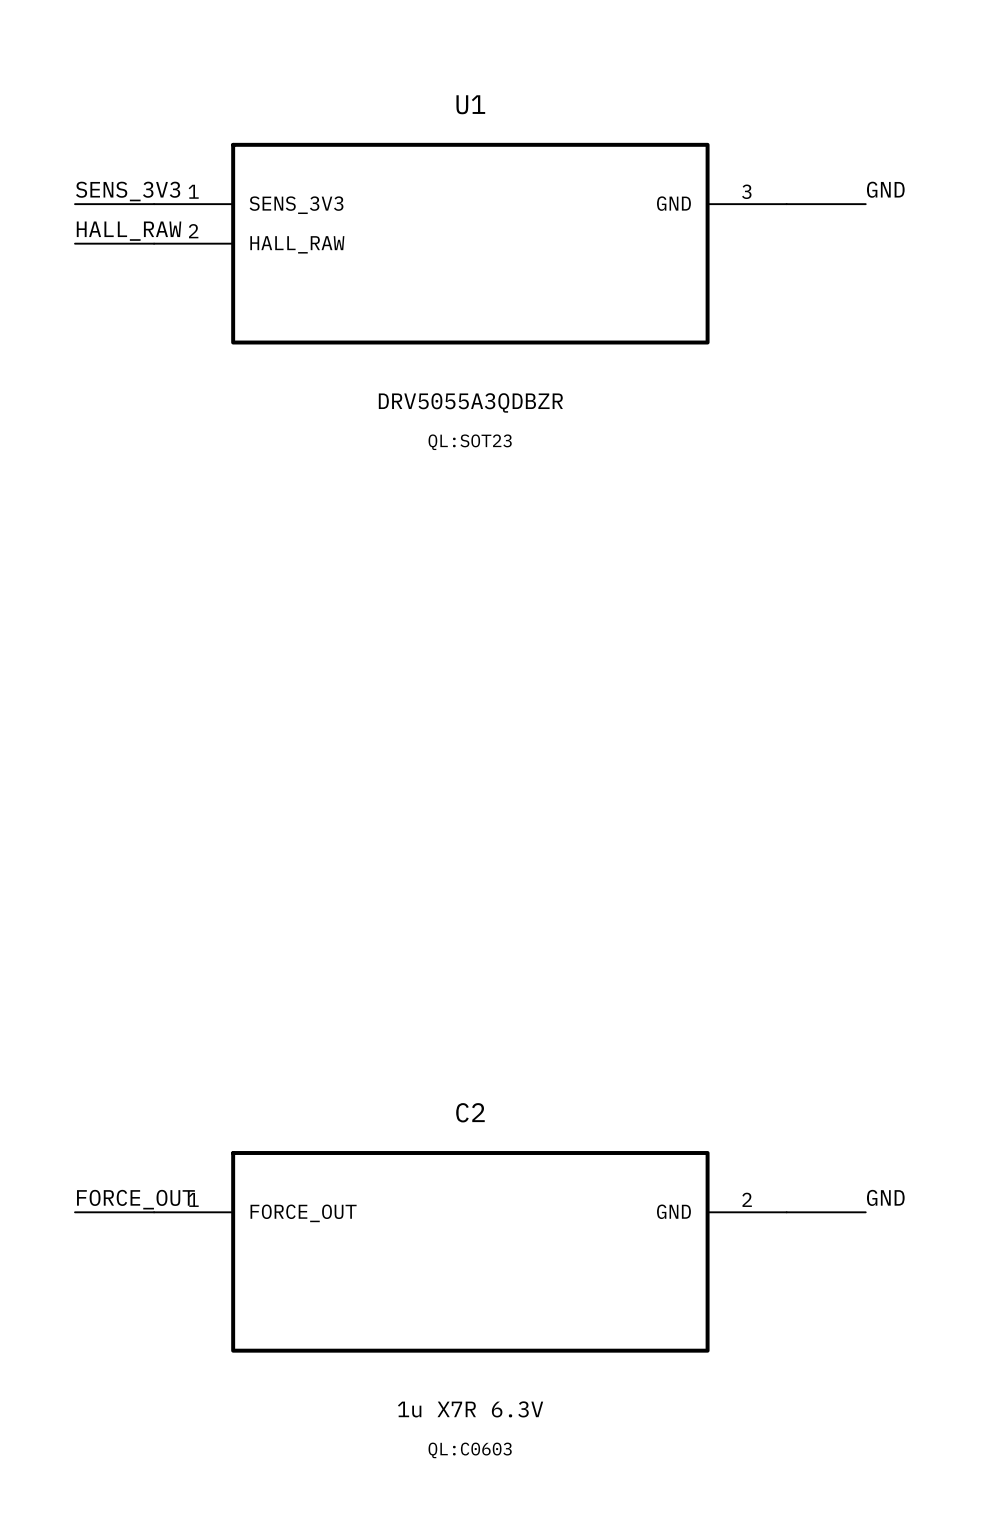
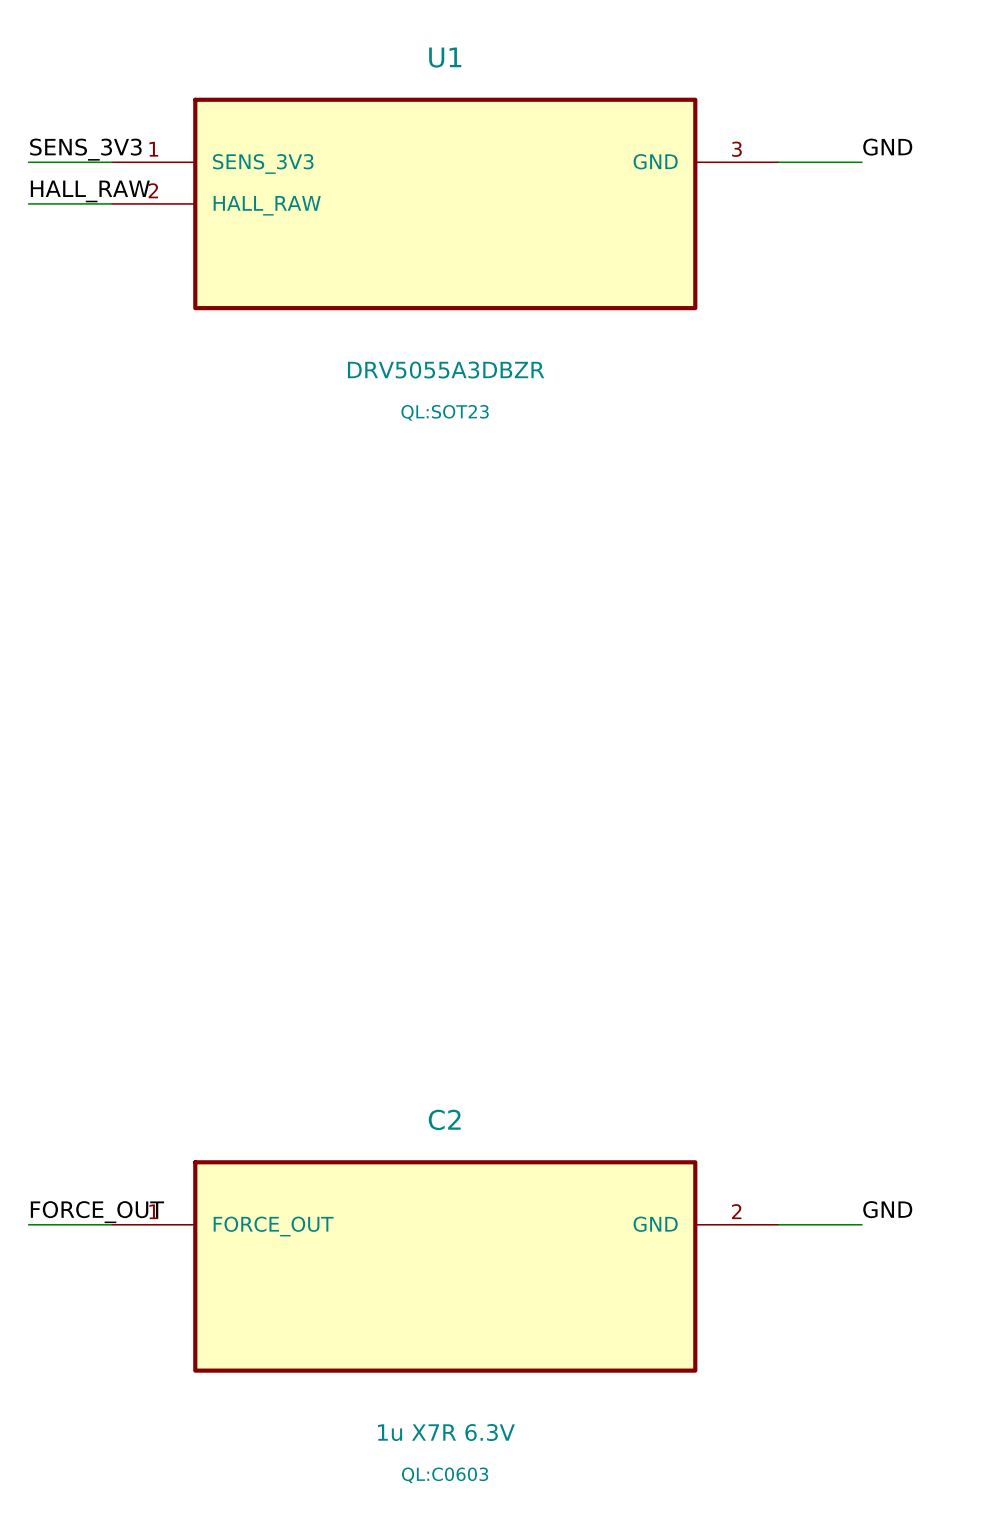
U1 value: DRV5055A3QDBZR (470, 402) -> DRV5055A3DBZR (446, 370)

